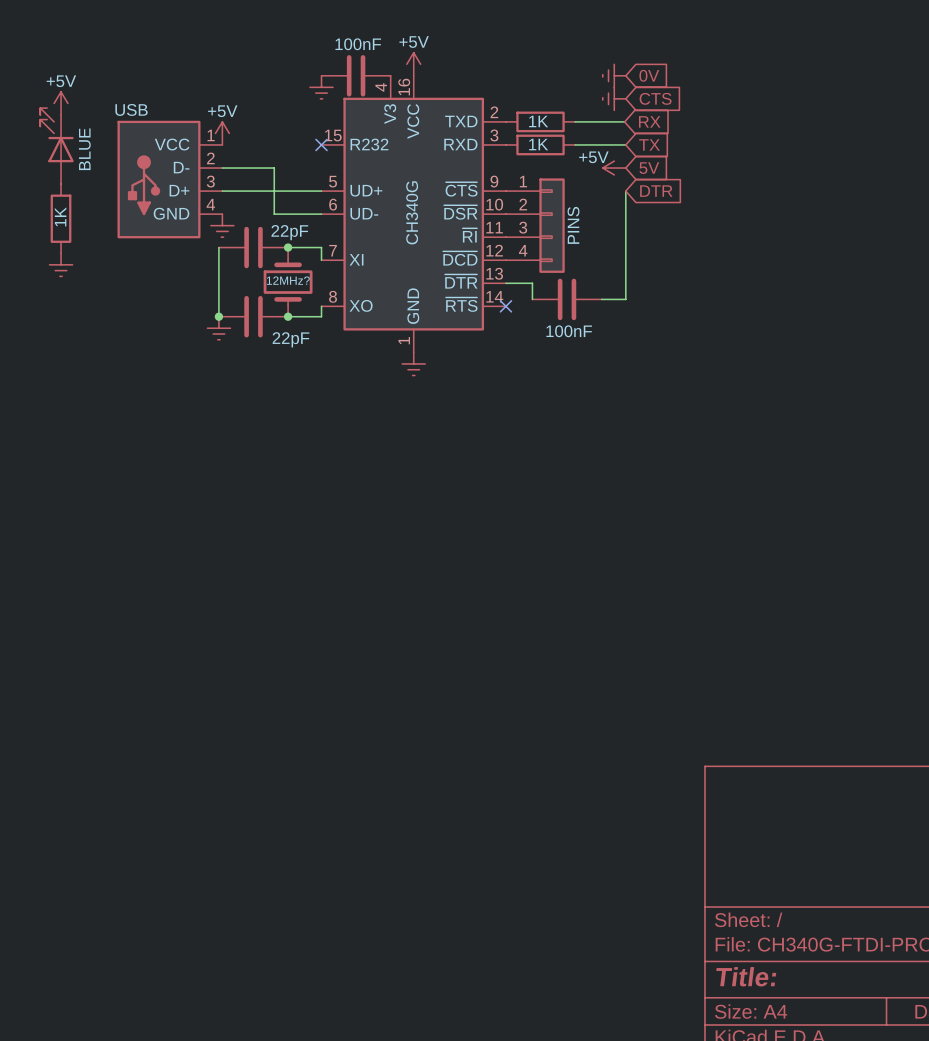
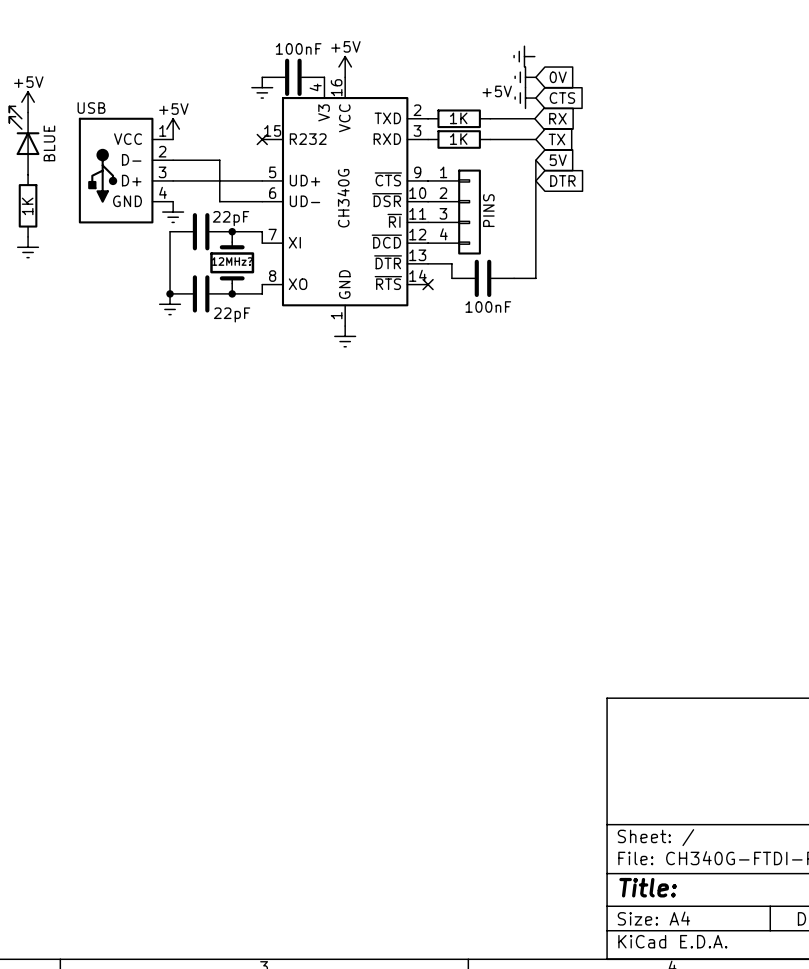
power symbol: none -> (524, 56)
power symbol text: none -> +5V (497, 91)
power symbol: +5V (614, 168) -> none
wire: none -> (535, 160) (535, 180)

